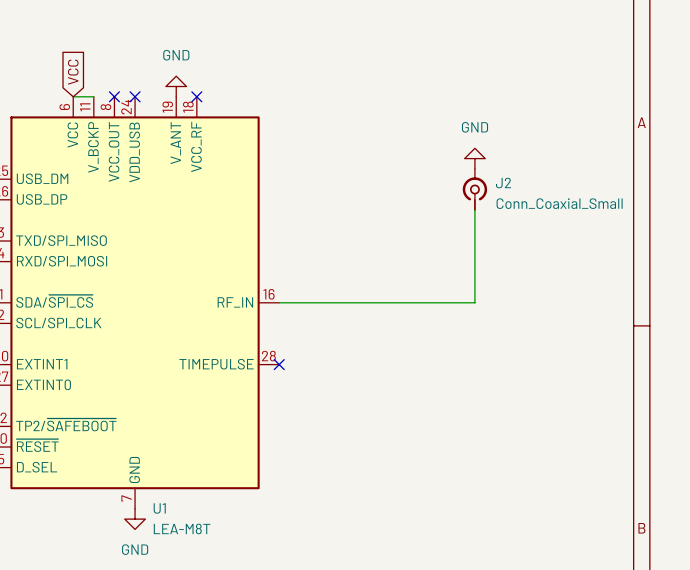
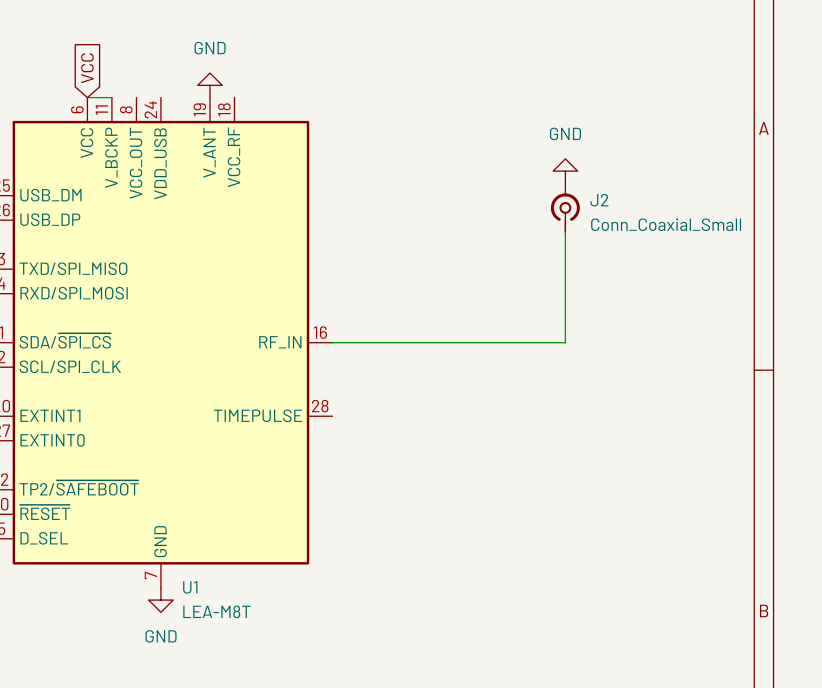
no-connect mark: (114, 96) -> none
no-connect mark: (135, 96) -> none
no-connect mark: (196, 96) -> none
no-connect mark: (279, 364) -> none

